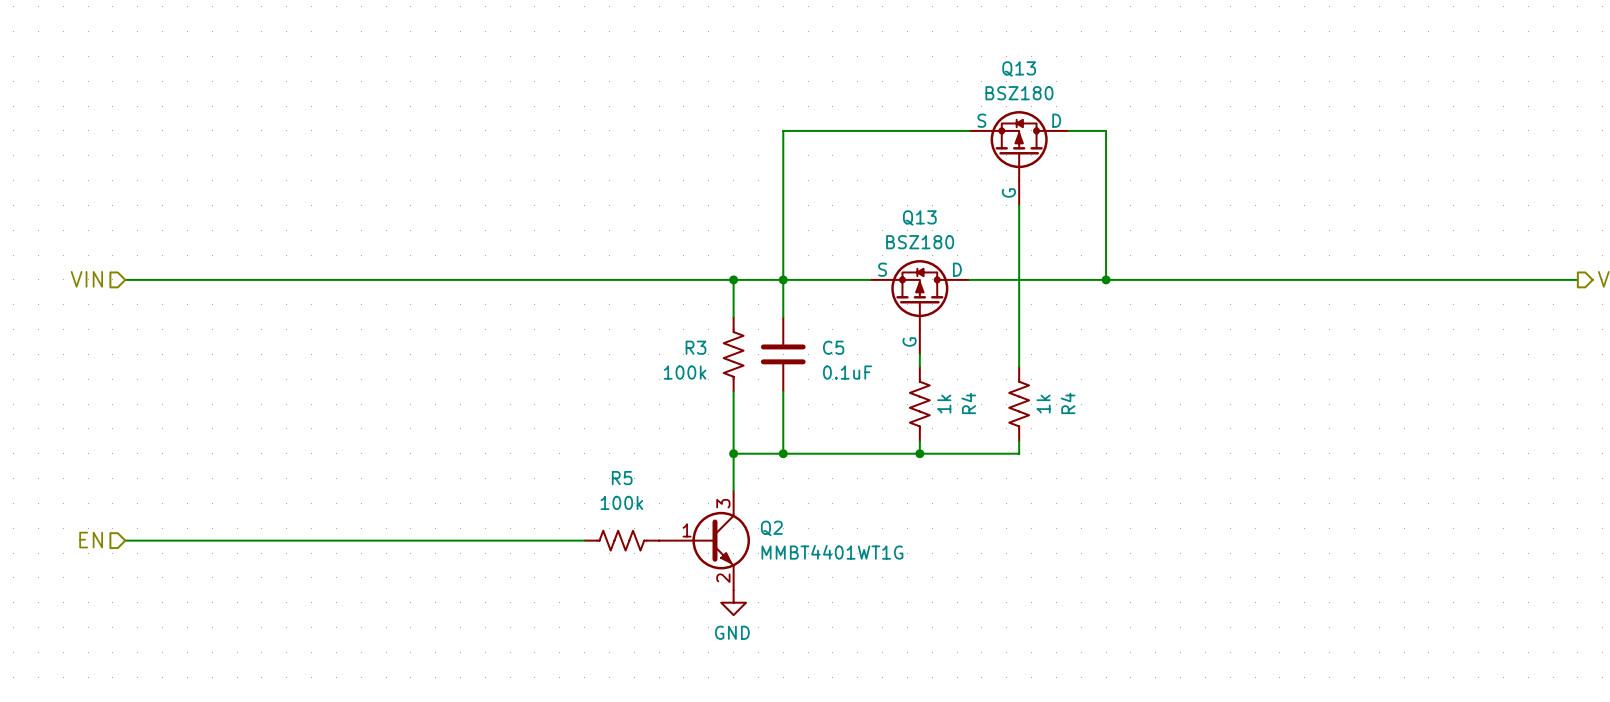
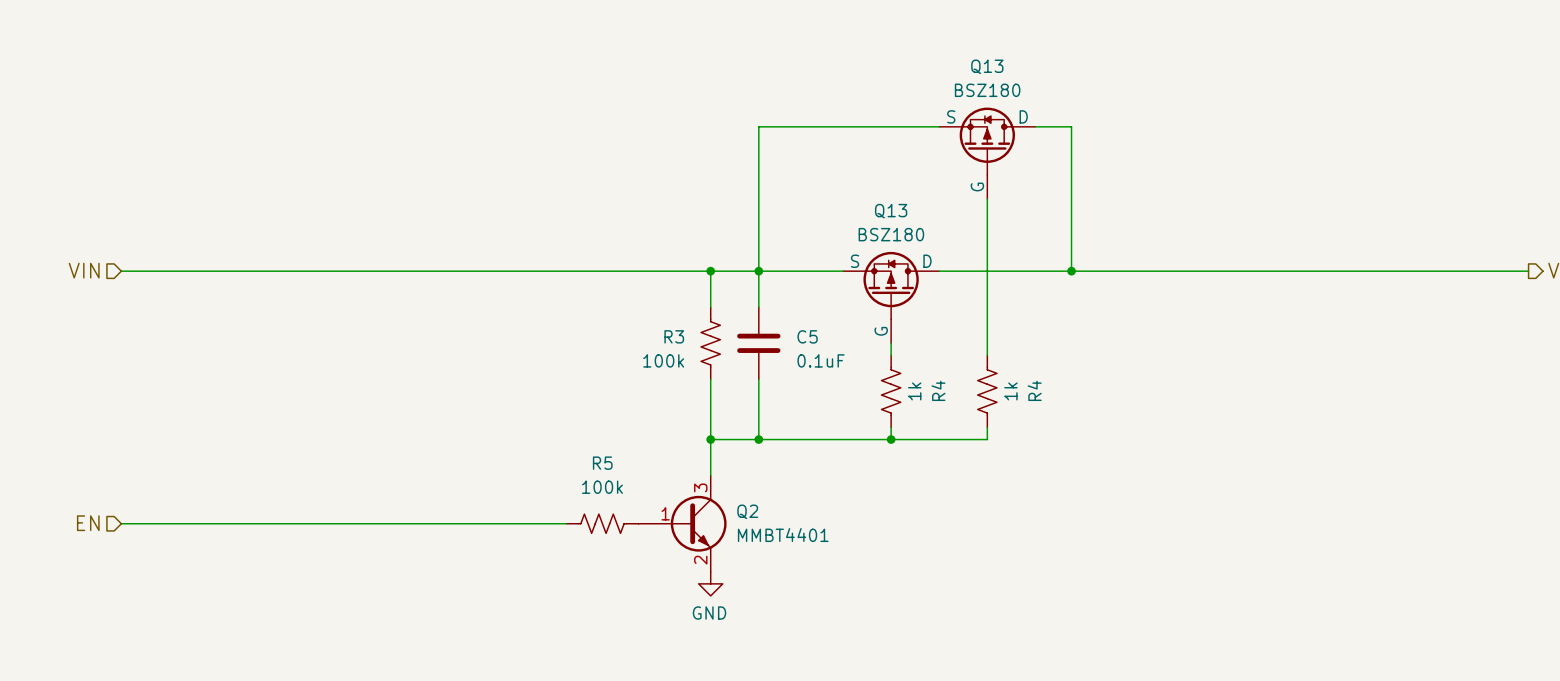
Q2 value: MMBT4401WT1G (832, 552) -> MMBT4401 (783, 535)

